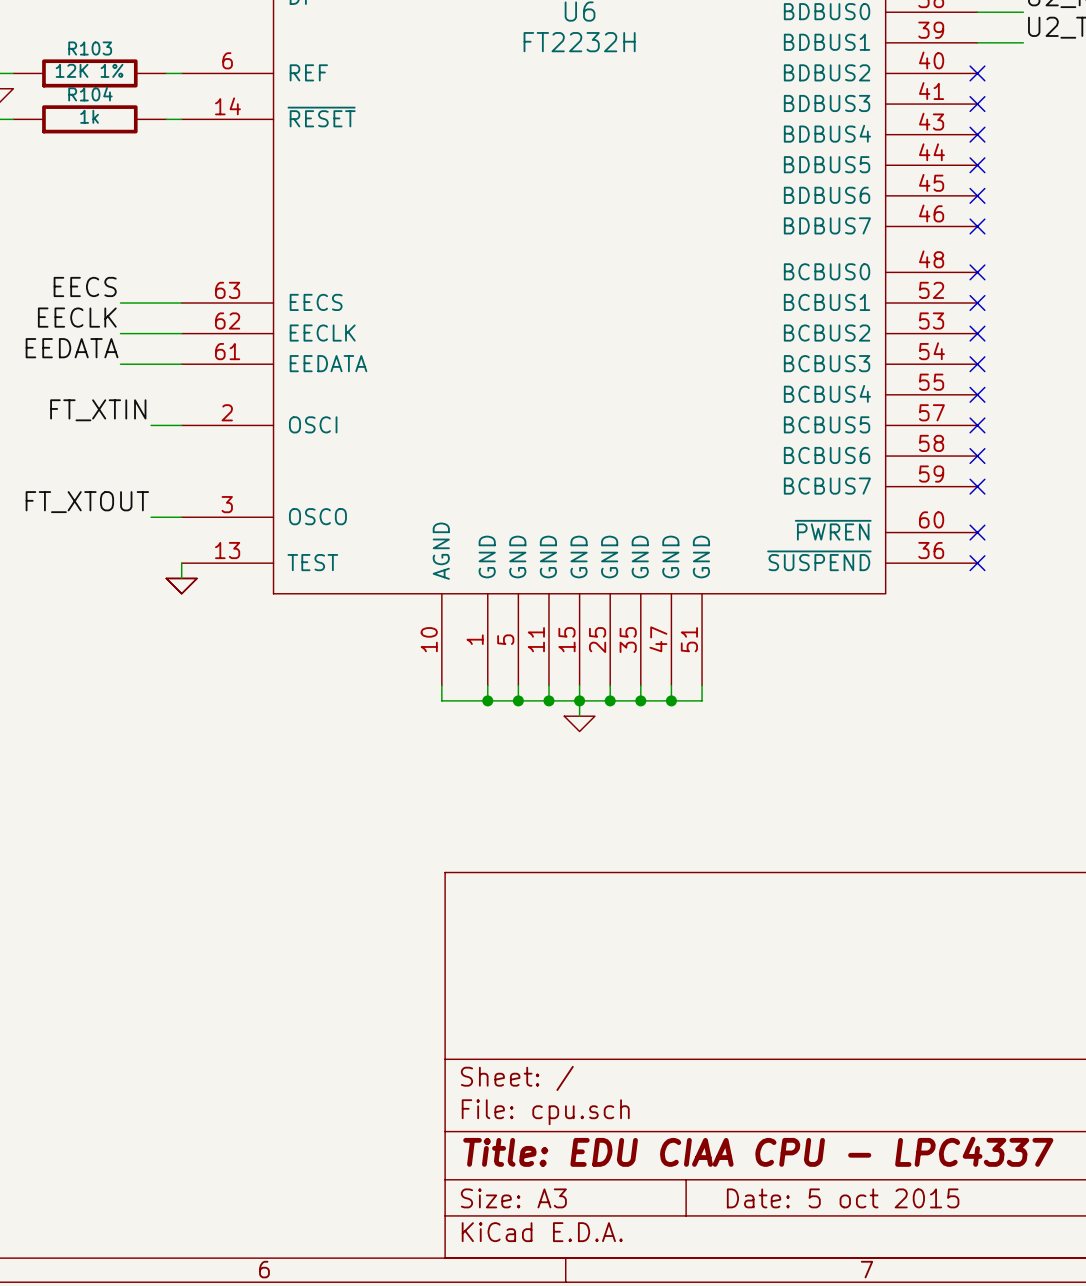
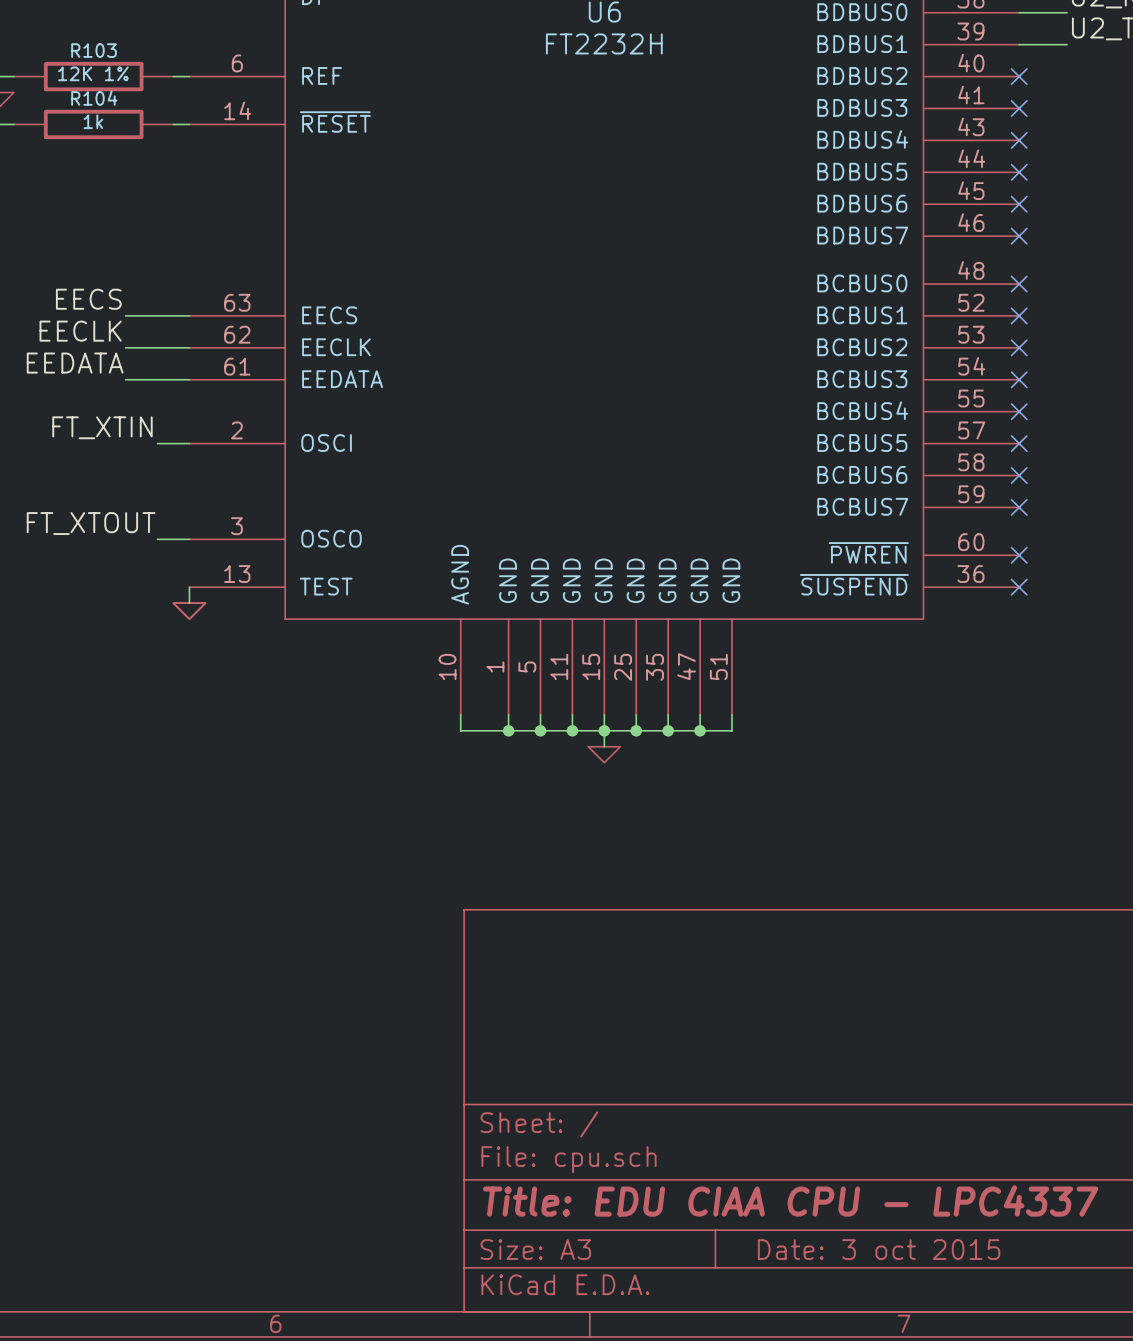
title block: Date: 5 oct 2015 (843, 1198) -> Date: 3 oct 2015 (879, 1249)

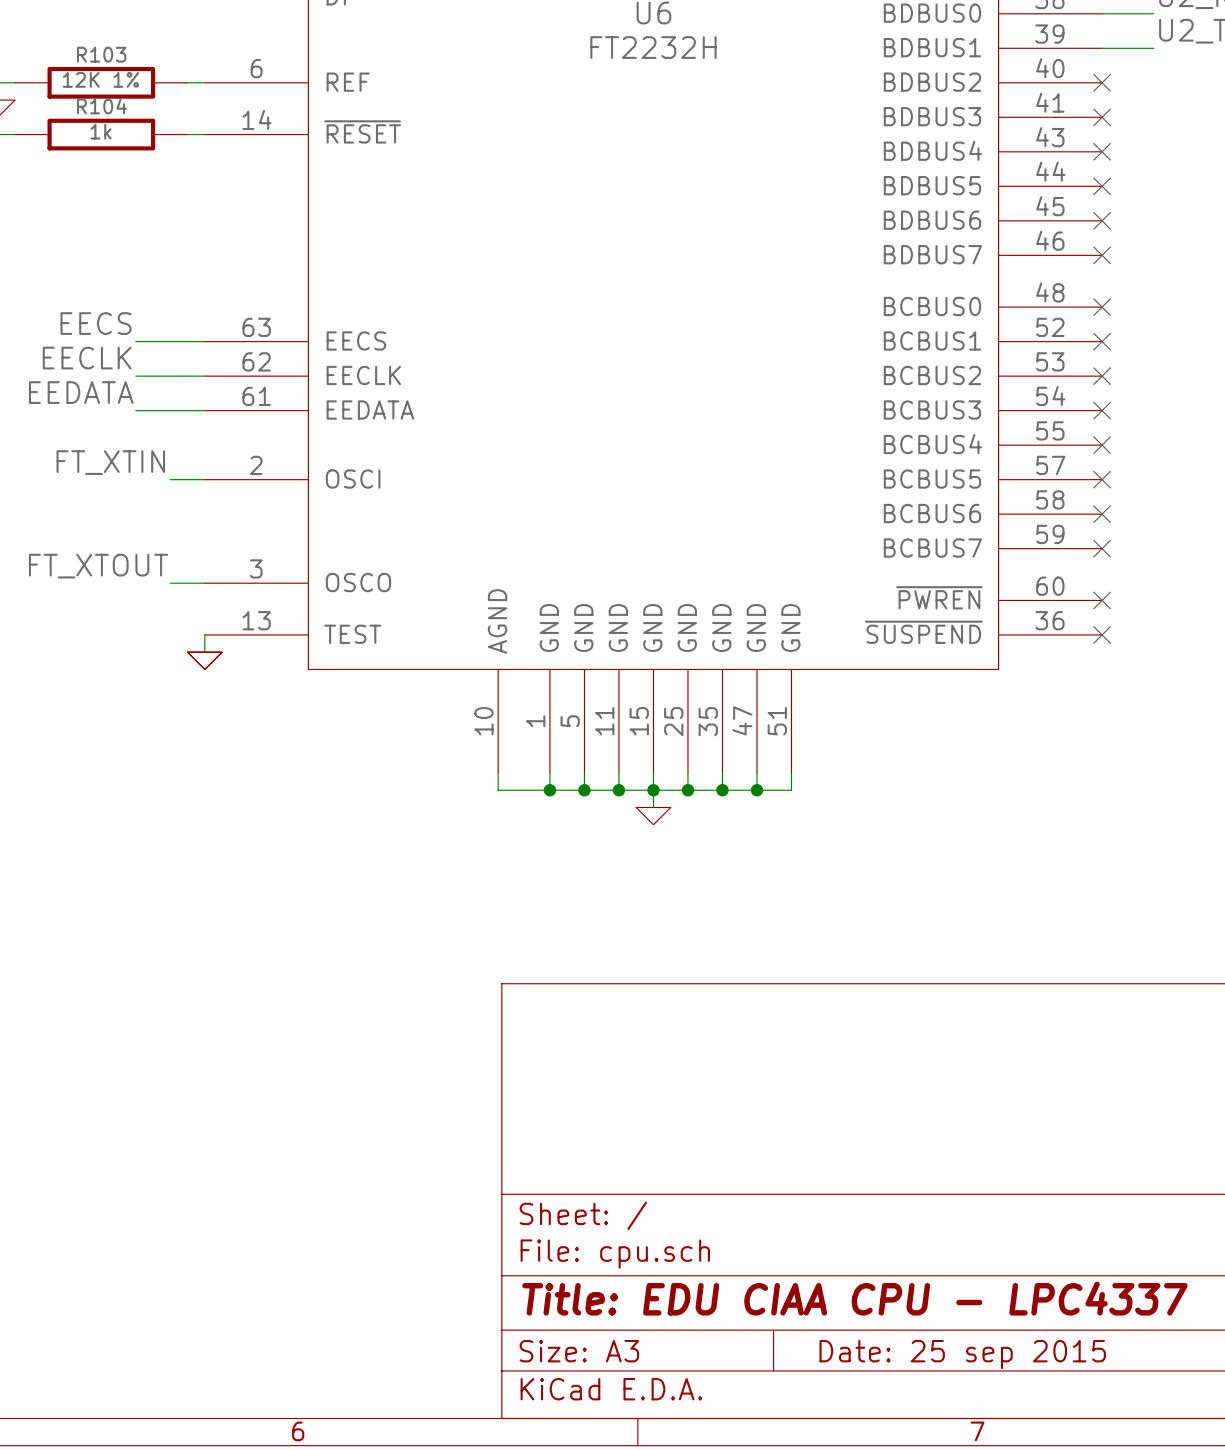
title block: Date: 3 oct 2015 (879, 1249) -> Date: 25 sep 2015 (962, 1354)

